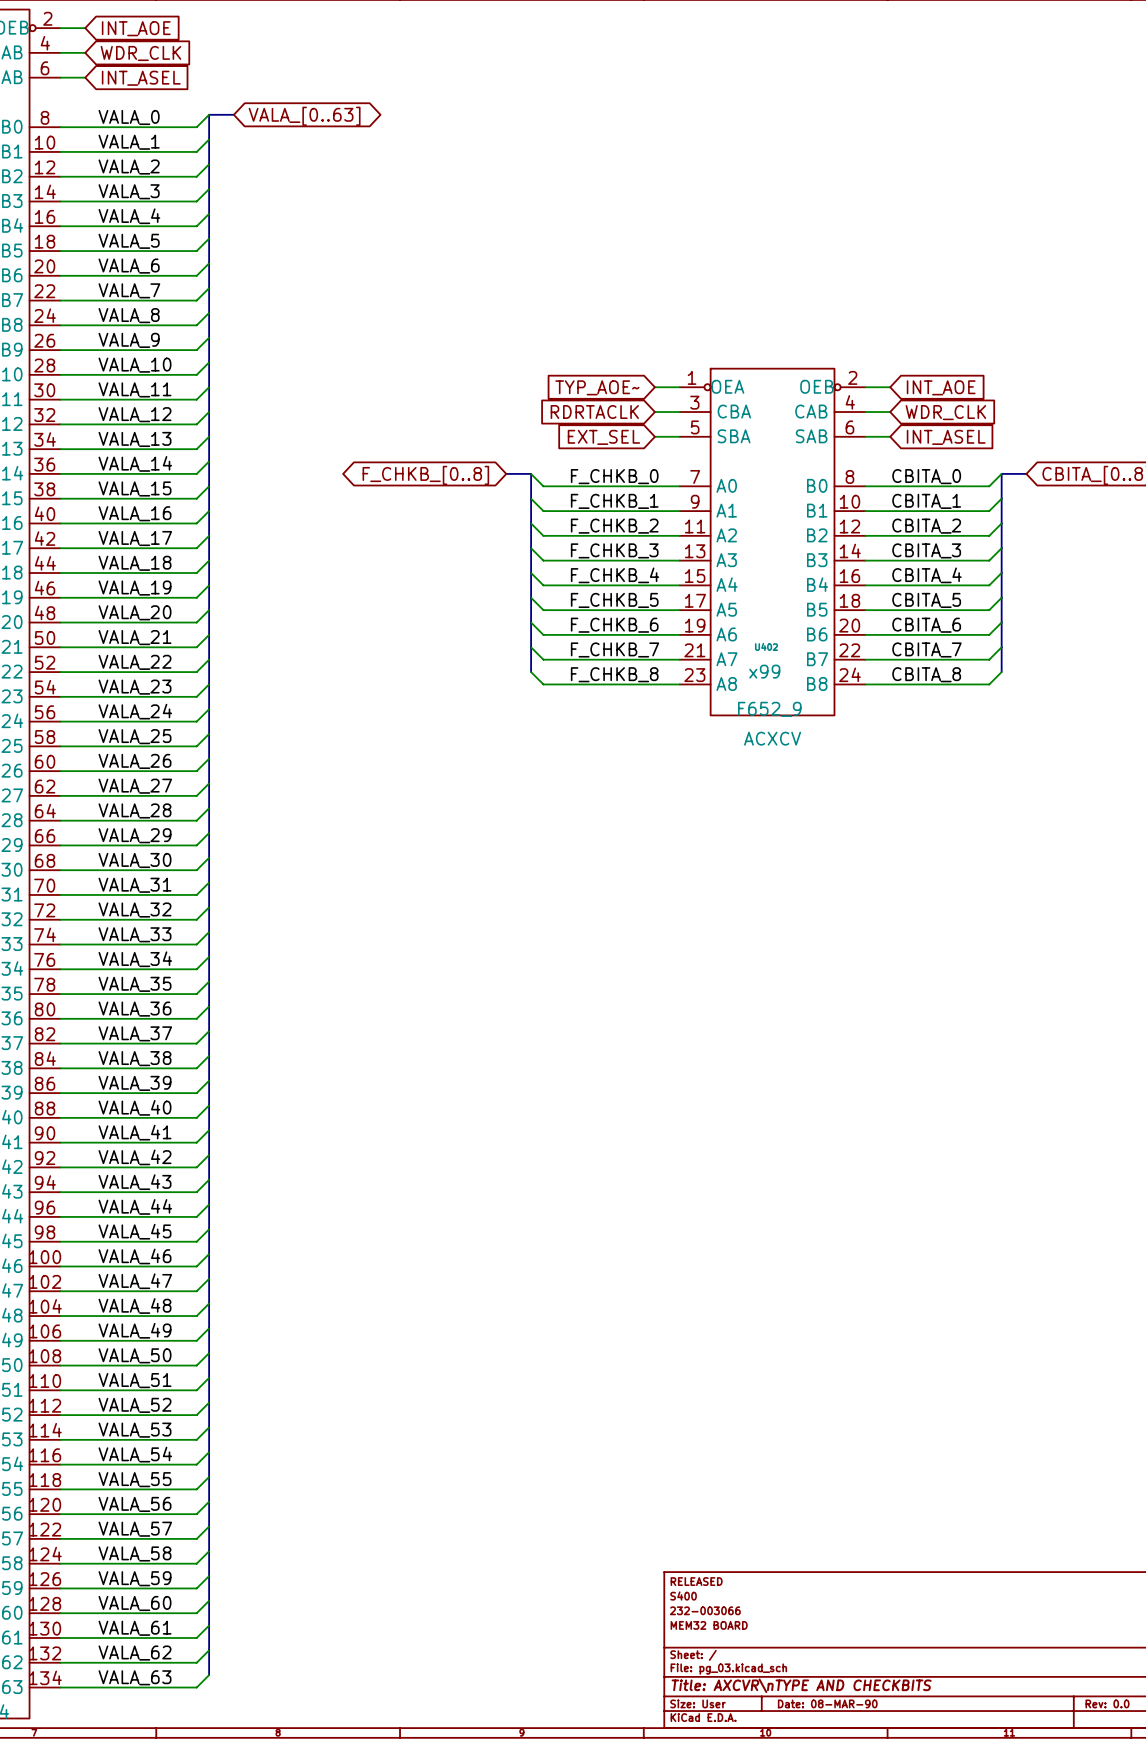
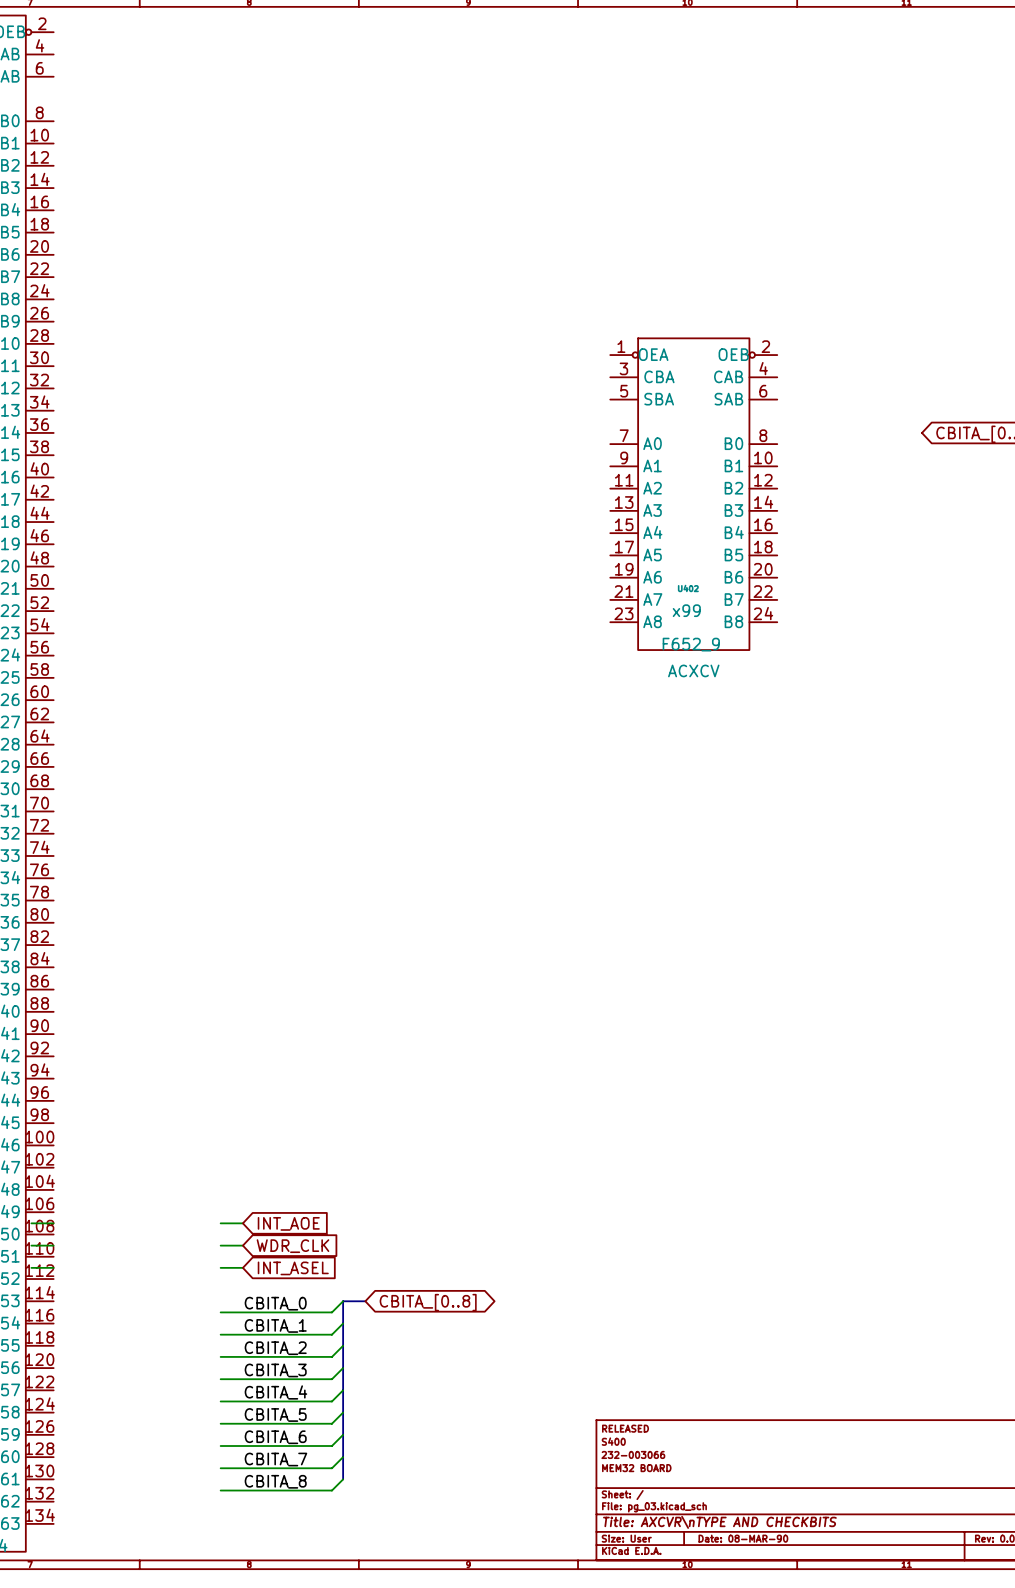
wire: (60, 28) (85, 28) -> none
global label: INT_AOE (136, 28) -> none
wire: (60, 52) (85, 52) -> none
global label: WDR_CLK (140, 53) -> none
wire: (60, 77) (85, 77) -> none
global label: INT_ASEL (141, 78) -> none
wire: (209, 114) (196, 127) (60, 127) -> none
bus: (233, 114) (209, 114) (209, 1675) -> none
global label: VALA_[0..63] (304, 116) -> none
label: VALA_0 (129, 117) -> none
wire: (209, 139) (196, 151) (60, 151) -> none
label: VALA_1 (129, 142) -> none
wire: (209, 164) (196, 176) (60, 176) -> none
label: VALA_2 (129, 167) -> none
wire: (209, 189) (196, 201) (60, 201) -> none
label: VALA_3 (129, 191) -> none
wire: (209, 213) (196, 226) (60, 226) -> none
label: VALA_4 (129, 216) -> none
wire: (209, 238) (196, 251) (60, 251) -> none
label: VALA_5 (129, 241) -> none
wire: (209, 263) (196, 275) (60, 275) -> none
label: VALA_6 (129, 266) -> none
wire: (209, 288) (196, 300) (60, 300) -> none
label: VALA_7 (129, 290) -> none
wire: (209, 312) (196, 325) (60, 325) -> none
label: VALA_8 (129, 315) -> none
wire: (209, 337) (196, 350) (60, 350) -> none
label: VALA_9 (129, 340) -> none
wire: (209, 362) (196, 374) (60, 374) -> none
label: VALA_10 (134, 365) -> none
wire: (209, 387) (196, 399) (60, 399) -> none
global label: TYP_AOE~ (597, 387) -> none
wire: (654, 387) (679, 387) -> none
wire: (865, 387) (890, 387) -> none
global label: INT_AOE (941, 387) -> none
label: VALA_11 (134, 389) -> none
wire: (209, 412) (196, 424) (60, 424) -> none
global label: RDRTACLK (594, 412) -> none
wire: (654, 412) (679, 412) -> none
wire: (865, 412) (890, 412) -> none
global label: WDR_CLK (945, 412) -> none
label: VALA_12 (134, 414) -> none
wire: (209, 436) (196, 449) (60, 449) -> none
wire: (654, 436) (679, 436) -> none
wire: (865, 436) (890, 436) -> none
global label: EXT_SEL (603, 437) -> none
global label: INT_ASEL (946, 437) -> none
label: VALA_13 (134, 439) -> none
wire: (209, 461) (196, 473) (60, 473) -> none
label: VALA_14 (135, 463) -> none
bus: (506, 473) (531, 473) (531, 672) -> none
wire: (531, 473) (543, 486) (679, 486) -> none
wire: (1001, 473) (989, 486) (865, 486) -> none
bus: (1026, 473) (1001, 473) (1001, 672) -> none
global label: F_CHKB_[0..8] (425, 475) -> none
label: F_CHKB_0 (614, 476) -> none
label: CBITA_0 (926, 476) -> none
wire: (209, 486) (196, 498) (60, 498) -> none
label: VALA_15 (134, 488) -> none
wire: (531, 498) (543, 511) (679, 511) -> none
wire: (1001, 498) (989, 511) (865, 511) -> none
label: F_CHKB_1 (614, 501) -> none
label: CBITA_1 (926, 501) -> none
wire: (209, 511) (196, 523) (60, 523) -> none
label: VALA_16 (134, 513) -> none
wire: (531, 523) (543, 535) (679, 535) -> none
wire: (1001, 523) (989, 535) (865, 535) -> none
label: F_CHKB_2 (614, 526) -> none
label: CBITA_2 (926, 526) -> none
wire: (209, 535) (196, 548) (60, 548) -> none
label: VALA_17 (135, 538) -> none
wire: (531, 548) (543, 560) (679, 560) -> none
wire: (1001, 548) (989, 560) (865, 560) -> none
label: F_CHKB_3 (614, 550) -> none
label: CBITA_3 (926, 550) -> none
wire: (209, 560) (196, 573) (60, 573) -> none
label: VALA_18 (134, 563) -> none
wire: (531, 573) (543, 585) (679, 585) -> none
wire: (1001, 573) (989, 585) (865, 585) -> none
label: F_CHKB_4 (615, 575) -> none
label: CBITA_4 (926, 575) -> none
wire: (209, 585) (196, 597) (60, 597) -> none
label: VALA_19 (134, 588) -> none
wire: (531, 597) (543, 610) (679, 610) -> none
wire: (1001, 597) (989, 610) (865, 610) -> none
label: F_CHKB_5 (614, 600) -> none
label: CBITA_5 (926, 600) -> none
wire: (209, 610) (196, 622) (60, 622) -> none
label: VALA_20 (134, 612) -> none
wire: (531, 622) (543, 634) (679, 634) -> none
wire: (1001, 622) (989, 634) (865, 634) -> none
label: F_CHKB_6 (614, 625) -> none
label: CBITA_6 (926, 625) -> none
wire: (209, 634) (196, 647) (60, 647) -> none
label: VALA_21 (134, 637) -> none
wire: (531, 647) (543, 659) (679, 659) -> none
wire: (1001, 647) (989, 659) (865, 659) -> none
label: F_CHKB_7 (615, 649) -> none
label: CBITA_7 (926, 649) -> none
wire: (209, 659) (196, 672) (60, 672) -> none
label: VALA_22 (134, 662) -> none
wire: (531, 672) (543, 684) (679, 684) -> none
wire: (1001, 672) (989, 684) (865, 684) -> none
label: F_CHKB_8 (614, 674) -> none
label: CBITA_8 (926, 674) -> none
wire: (209, 684) (196, 696) (60, 696) -> none
label: VALA_23 (134, 687) -> none
wire: (209, 709) (196, 721) (60, 721) -> none
label: VALA_24 (135, 711) -> none
wire: (209, 733) (196, 746) (60, 746) -> none
label: VALA_25 (134, 736) -> none
wire: (209, 758) (196, 771) (60, 771) -> none
label: VALA_26 (134, 761) -> none
wire: (209, 783) (196, 795) (60, 795) -> none
label: VALA_27 (135, 786) -> none
wire: (209, 808) (196, 820) (60, 820) -> none
label: VALA_28 (134, 810) -> none
wire: (209, 833) (196, 845) (60, 845) -> none
label: VALA_29 (134, 835) -> none
wire: (209, 857) (196, 870) (60, 870) -> none
label: VALA_30 (134, 860) -> none
wire: (209, 882) (196, 894) (60, 894) -> none
label: VALA_31 (134, 885) -> none
wire: (209, 907) (196, 919) (60, 919) -> none
label: VALA_32 (134, 910) -> none
wire: (209, 932) (196, 944) (60, 944) -> none
label: VALA_33 (134, 934) -> none
wire: (209, 956) (196, 969) (60, 969) -> none
label: VALA_34 (135, 959) -> none
wire: (209, 981) (196, 994) (60, 994) -> none
label: VALA_35 (134, 984) -> none
wire: (209, 1006) (196, 1018) (60, 1018) -> none
label: VALA_36 (134, 1009) -> none
wire: (209, 1031) (196, 1043) (60, 1043) -> none
label: VALA_37 (135, 1033) -> none
wire: (209, 1055) (196, 1068) (60, 1068) -> none
label: VALA_38 (134, 1058) -> none
wire: (209, 1080) (196, 1093) (60, 1093) -> none
label: VALA_39 (134, 1083) -> none
wire: (209, 1105) (196, 1117) (60, 1117) -> none
label: VALA_40 (134, 1107) -> none
wire: (209, 1130) (196, 1142) (60, 1142) -> none
label: VALA_41 (134, 1132) -> none
wire: (209, 1155) (196, 1167) (60, 1167) -> none
label: VALA_42 (134, 1157) -> none
wire: (209, 1179) (196, 1192) (60, 1192) -> none
label: VALA_43 (134, 1182) -> none
wire: (209, 1204) (196, 1216) (60, 1216) -> none
label: VALA_44 (135, 1206) -> none
wire: (209, 1229) (196, 1241) (60, 1241) -> none
label: VALA_45 (134, 1231) -> none
wire: (209, 1254) (196, 1266) (60, 1266) -> none
label: VALA_46 (134, 1256) -> none
wire: (209, 1278) (196, 1291) (60, 1291) -> none
label: VALA_47 (135, 1281) -> none
wire: (209, 1303) (196, 1316) (60, 1316) -> none
label: VALA_48 (134, 1306) -> none
wire: (209, 1328) (196, 1340) (60, 1340) -> none
label: VALA_49 (134, 1330) -> none
wire: none -> (31, 1223) (53, 1223)
wire: (209, 1353) (196, 1365) (60, 1365) -> none
wire: none -> (220, 1223) (242, 1223)
global label: none -> INT_AOE (288, 1223)
label: VALA_50 (134, 1355) -> none
wire: none -> (31, 1245) (53, 1245)
wire: (209, 1377) (196, 1390) (60, 1390) -> none
wire: none -> (220, 1245) (242, 1245)
global label: none -> WDR_CLK (292, 1246)
label: VALA_51 (134, 1380) -> none
wire: none -> (31, 1267) (53, 1267)
wire: (209, 1402) (196, 1415) (60, 1415) -> none
wire: none -> (220, 1267) (242, 1267)
global label: none -> INT_ASEL (293, 1268)
label: VALA_52 (134, 1405) -> none
wire: (209, 1427) (196, 1439) (60, 1439) -> none
label: VALA_53 (134, 1430) -> none
wire: none -> (343, 1301) (331, 1312) (220, 1312)
bus: none -> (365, 1301) (343, 1301) (343, 1479)
global label: none -> CBITA_[0..8] (428, 1302)
label: none -> CBITA_0 (275, 1303)
wire: (209, 1452) (196, 1464) (60, 1464) -> none
label: VALA_54 (135, 1454) -> none
wire: none -> (343, 1323) (331, 1334) (220, 1334)
label: none -> CBITA_1 (275, 1325)
wire: (209, 1477) (196, 1489) (60, 1489) -> none
label: VALA_55 (134, 1479) -> none
wire: none -> (343, 1345) (331, 1356) (220, 1356)
label: none -> CBITA_2 (275, 1348)
wire: (209, 1501) (196, 1514) (60, 1514) -> none
label: VALA_56 (134, 1504) -> none
wire: none -> (343, 1368) (331, 1379) (220, 1379)
label: none -> CBITA_3 (275, 1370)
wire: (209, 1526) (196, 1538) (60, 1538) -> none
label: VALA_57 (135, 1529) -> none
wire: none -> (343, 1390) (331, 1401) (220, 1401)
label: none -> CBITA_4 (275, 1392)
wire: (209, 1551) (196, 1563) (60, 1563) -> none
label: VALA_58 (134, 1553) -> none
wire: none -> (343, 1412) (331, 1423) (220, 1423)
label: none -> CBITA_5 (275, 1415)
wire: (209, 1576) (196, 1588) (60, 1588) -> none
label: VALA_59 (134, 1578) -> none
wire: none -> (343, 1434) (331, 1446) (220, 1446)
label: none -> CBITA_6 (275, 1437)
wire: (209, 1600) (196, 1613) (60, 1613) -> none
label: VALA_60 (134, 1603) -> none
wire: none -> (343, 1457) (331, 1468) (220, 1468)
label: none -> CBITA_7 (275, 1459)
wire: (209, 1625) (196, 1637) (60, 1637) -> none
label: VALA_61 (134, 1628) -> none
wire: none -> (343, 1479) (331, 1490) (220, 1490)
label: none -> CBITA_8 (275, 1481)
wire: (209, 1650) (196, 1662) (60, 1662) -> none
label: VALA_62 (134, 1653) -> none
wire: (209, 1675) (196, 1687) (60, 1687) -> none
label: VALA_63 (134, 1677) -> none

